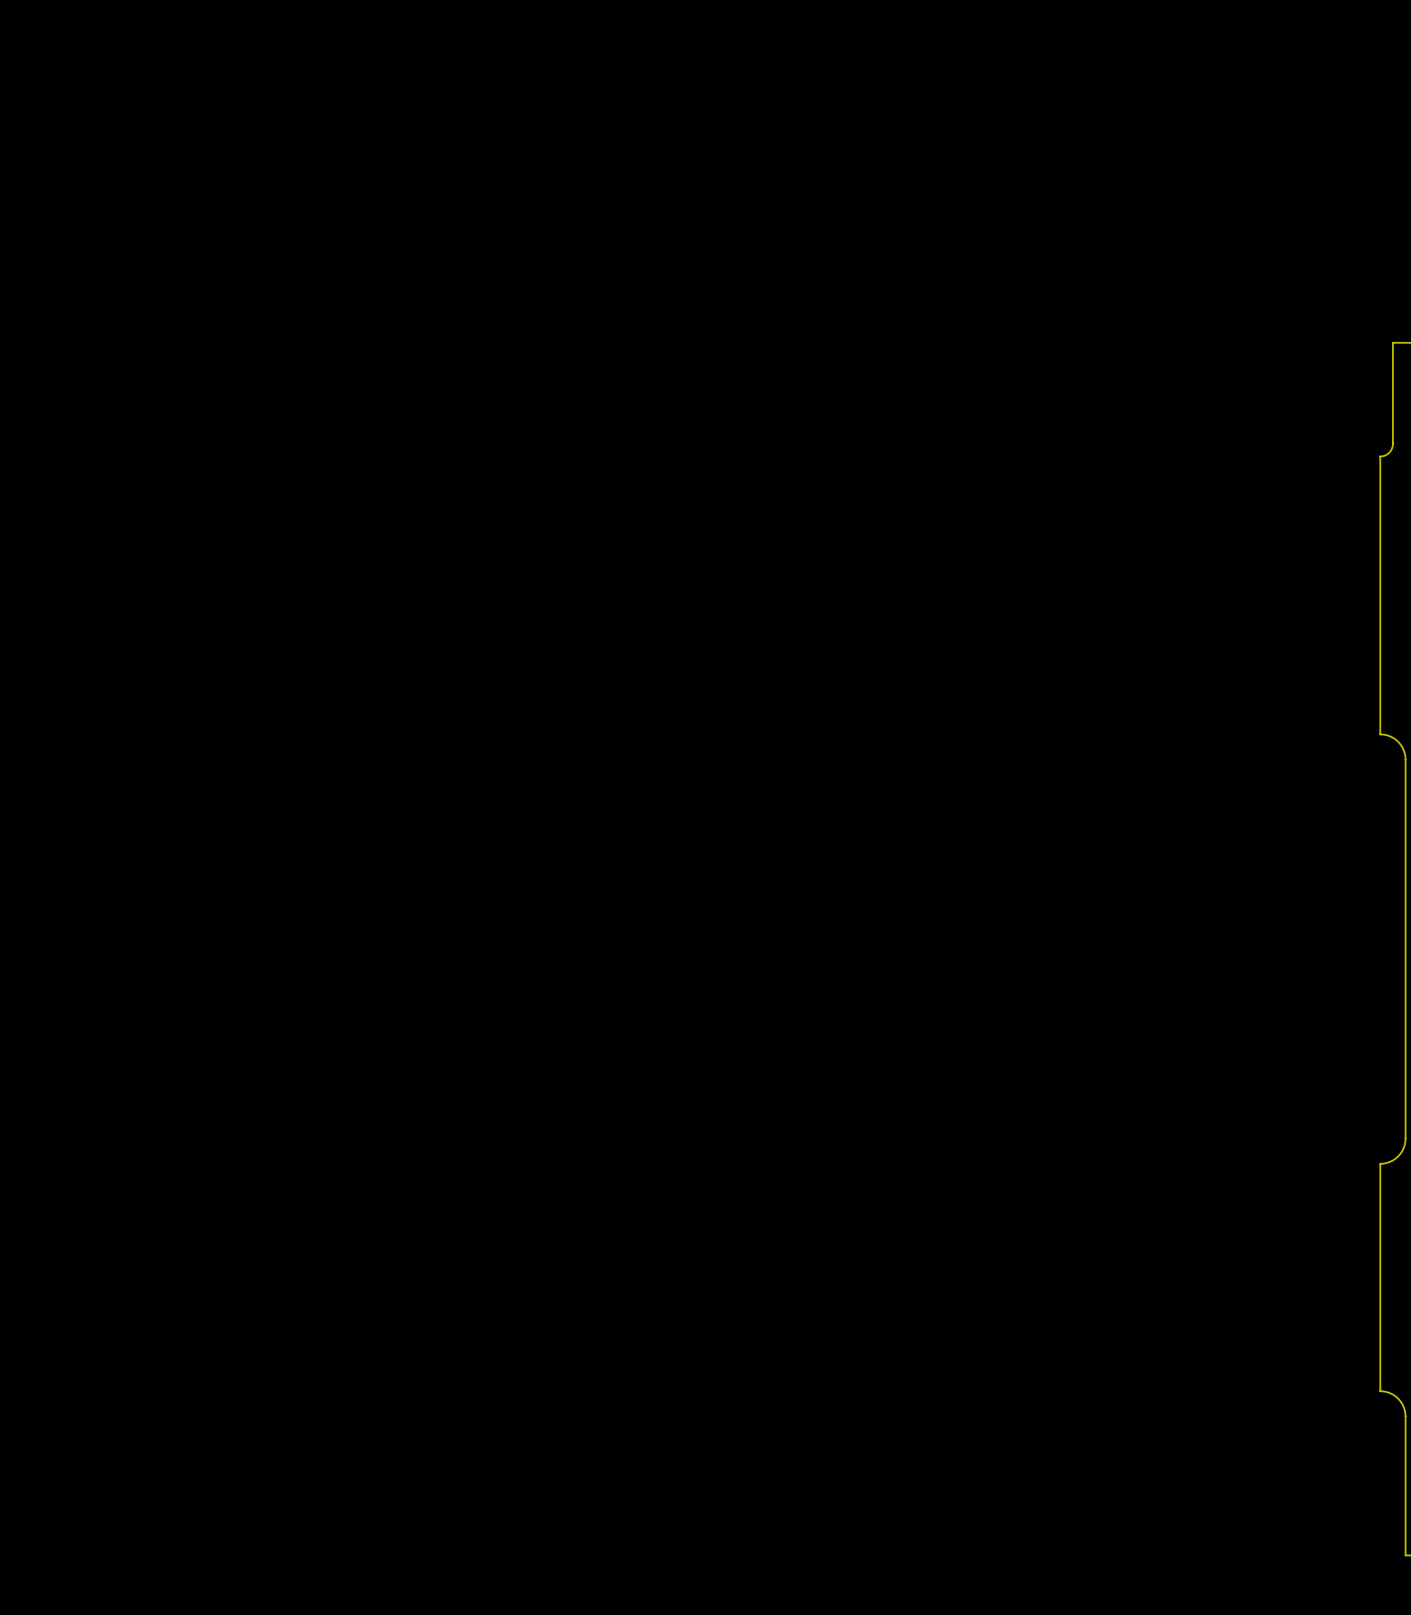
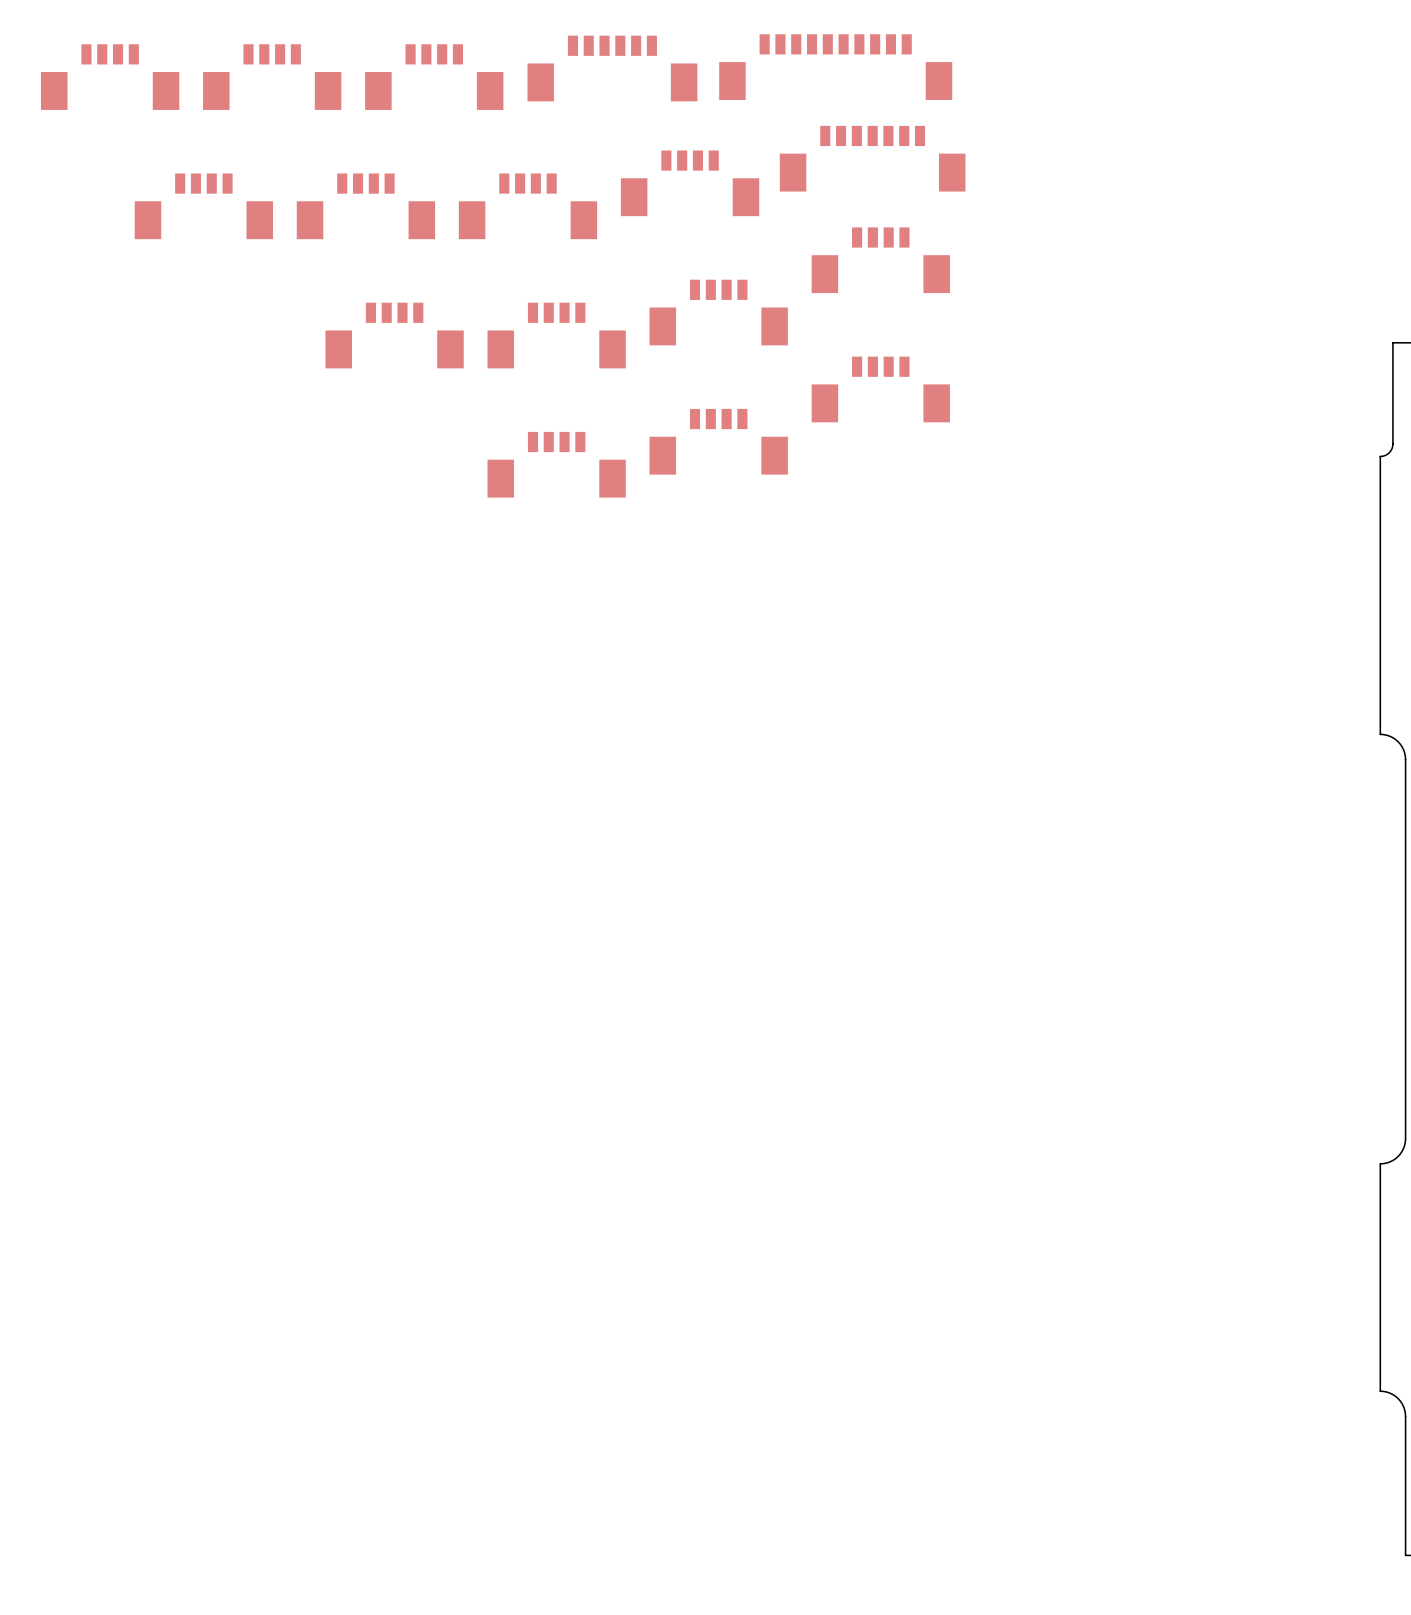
part: none -> (835, 67)
part: none -> (612, 68)
part: none -> (110, 77)
part: none -> (272, 77)
part: none -> (434, 77)
part: none -> (872, 158)
part: none -> (690, 183)
part: none -> (203, 206)
part: none -> (365, 206)
part: none -> (527, 206)
part: none -> (880, 260)
part: none -> (718, 312)
part: none -> (394, 335)
part: none -> (556, 335)
part: none -> (880, 389)
part: none -> (718, 441)
part: none -> (556, 464)

